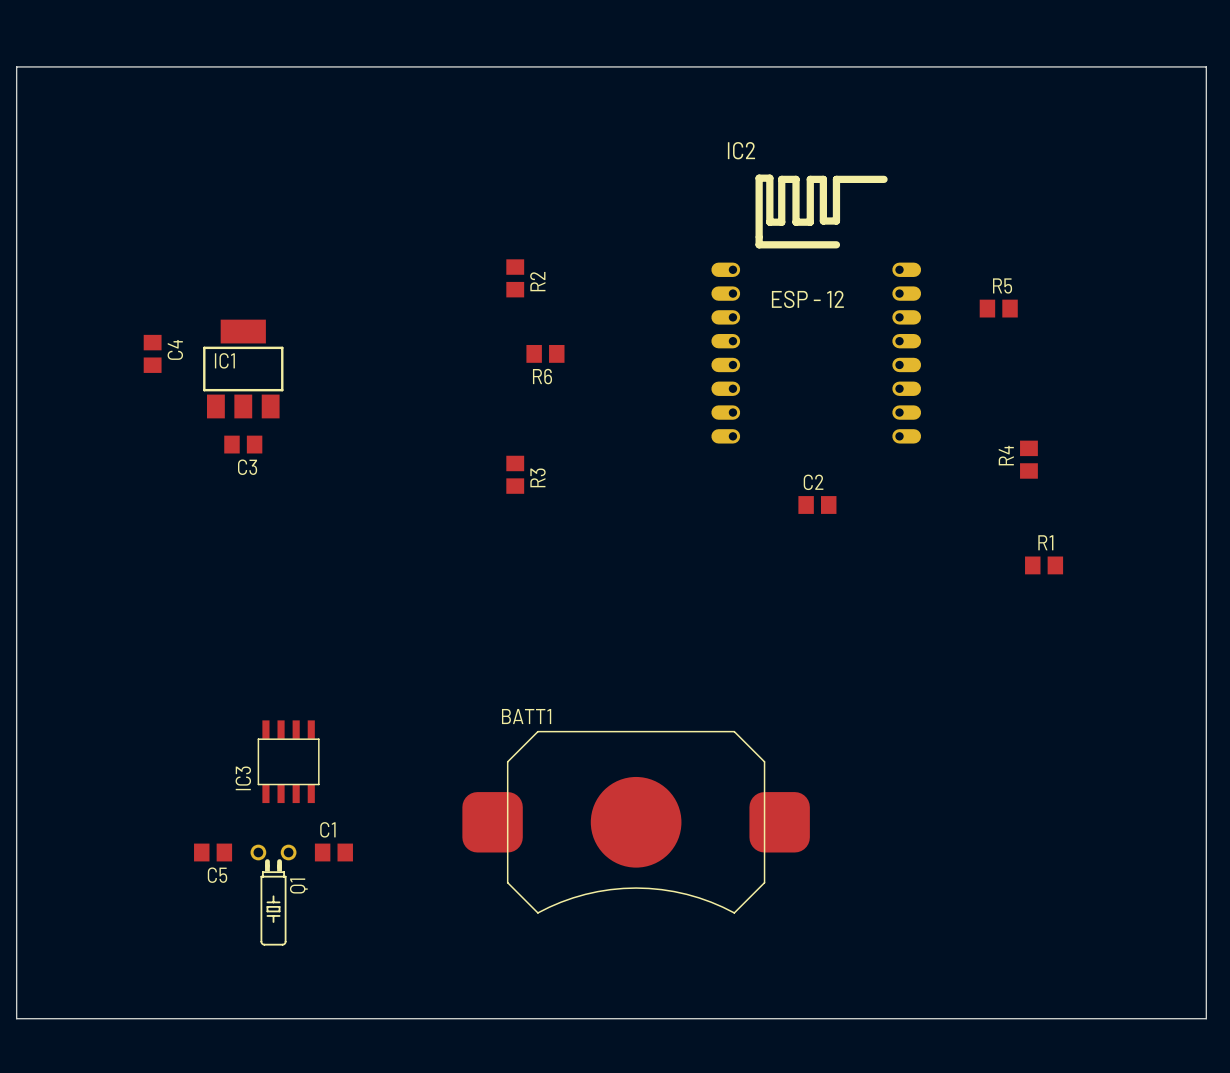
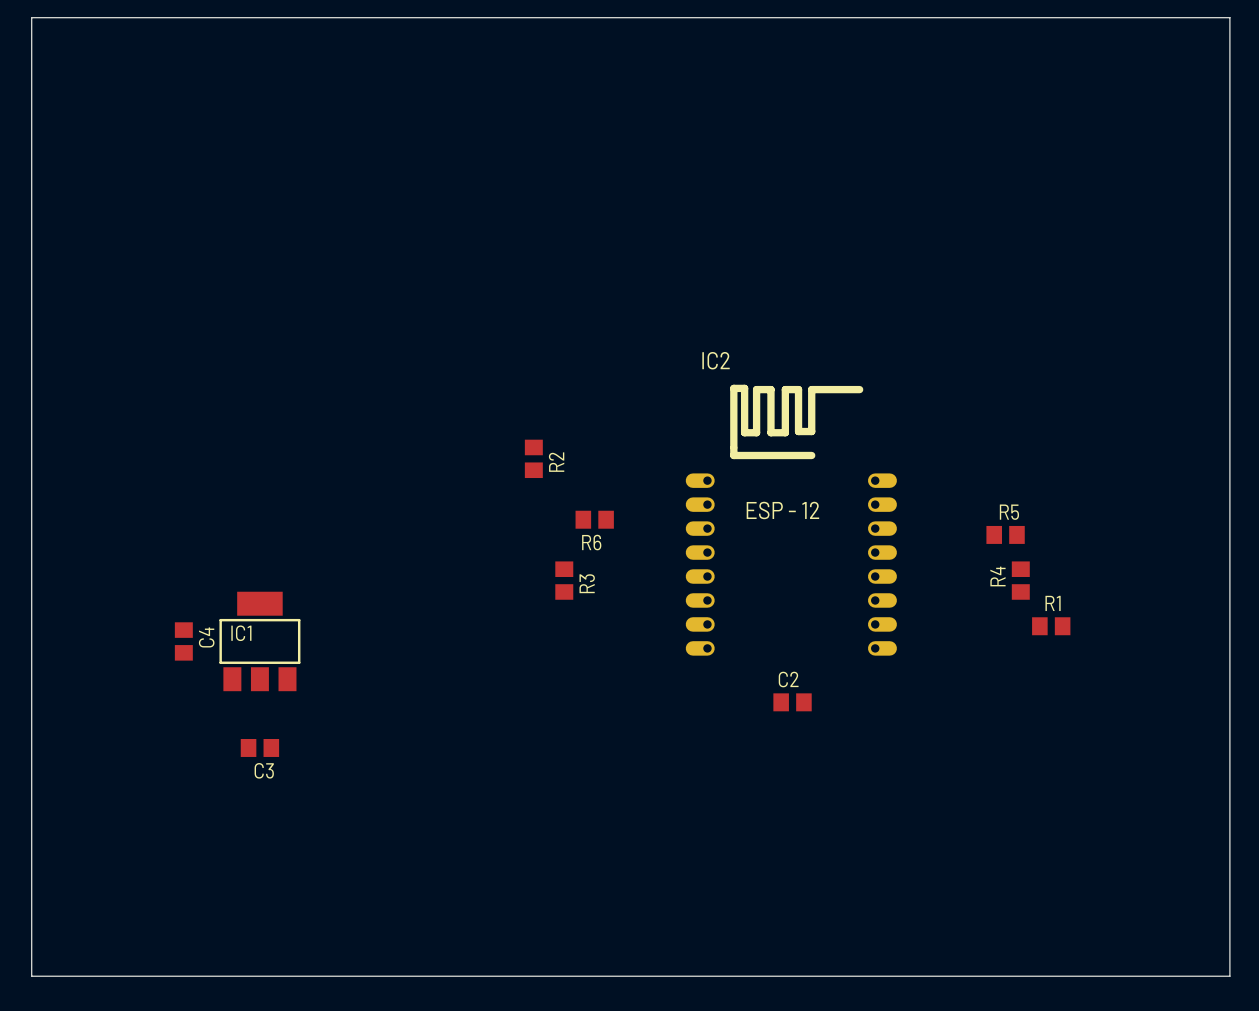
R2 position: (515, 278) -> (533, 458)
R5 position: (998, 308) -> (1005, 534)
IC2 position: (816, 309) -> (791, 520)
C4 position: (152, 353) -> (183, 641)
R6 position: (545, 353) -> (594, 519)
IC1 position: (243, 369) -> (259, 641)
C3 position: (243, 444) -> (259, 747)
R4 position: (1028, 459) -> (1020, 580)
R3 position: (515, 474) -> (564, 580)
C2 position: (817, 504) -> (792, 702)
R1 position: (1044, 565) -> (1051, 626)
IC3: (288, 761) -> none
BATT1: (636, 822) -> none
C5: (213, 852) -> none
C1: (333, 852) -> none
Q1: (273, 895) -> none

